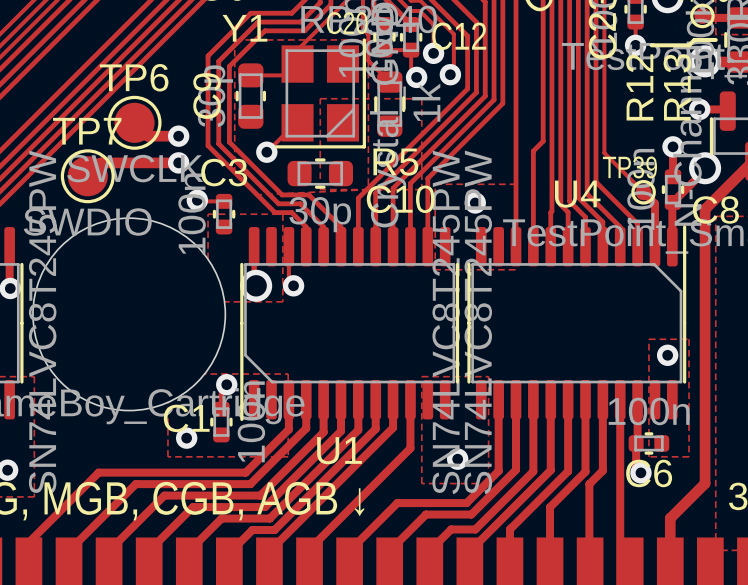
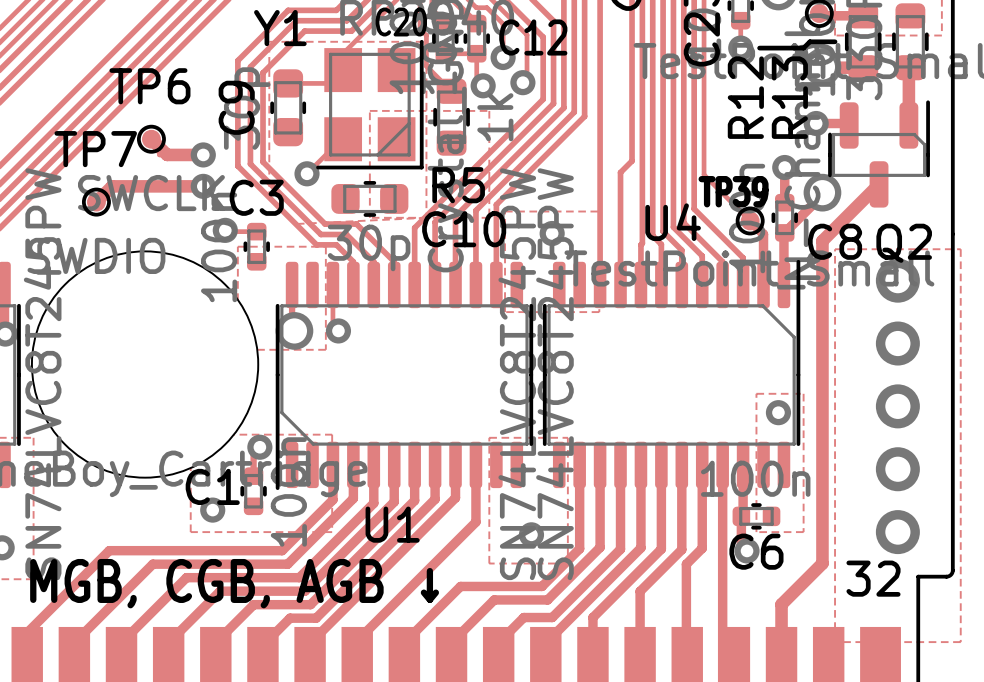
TP6 footprint: [107, 95, 162, 150] -> [136, 124, 166, 154]
TP7 footprint: [60, 149, 115, 204] -> [81, 187, 111, 217]

